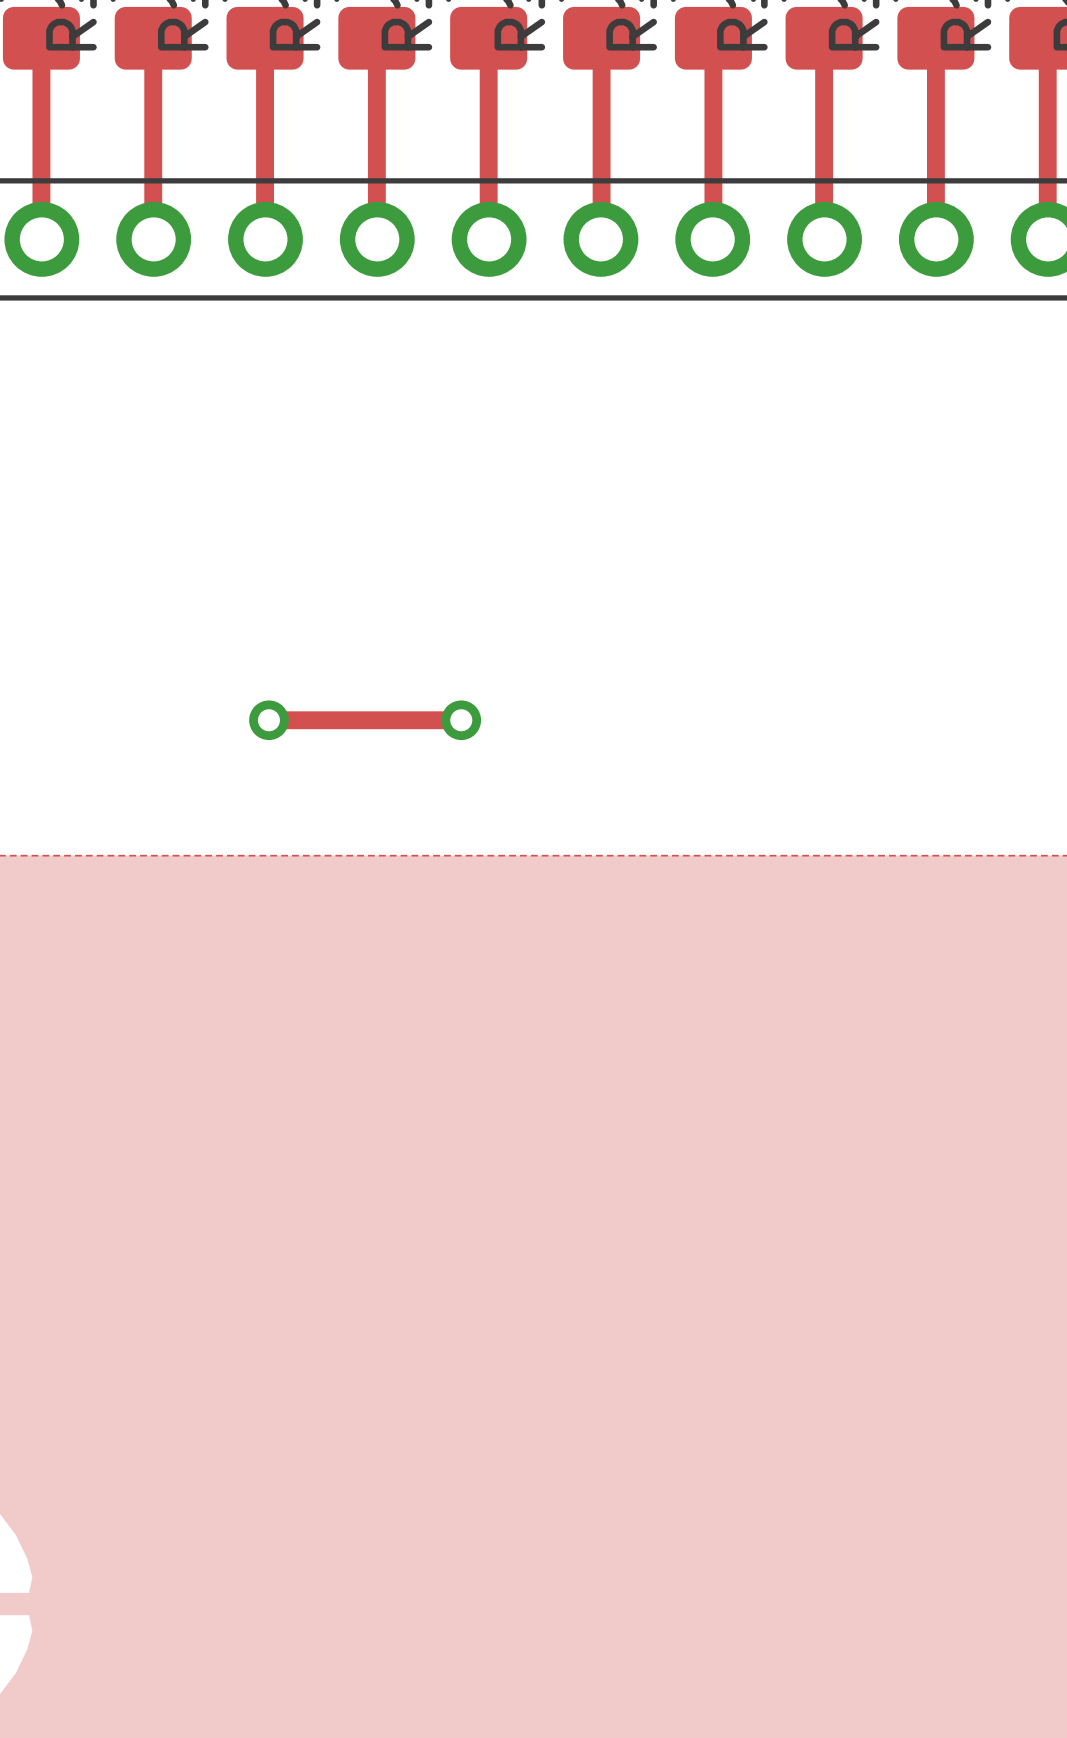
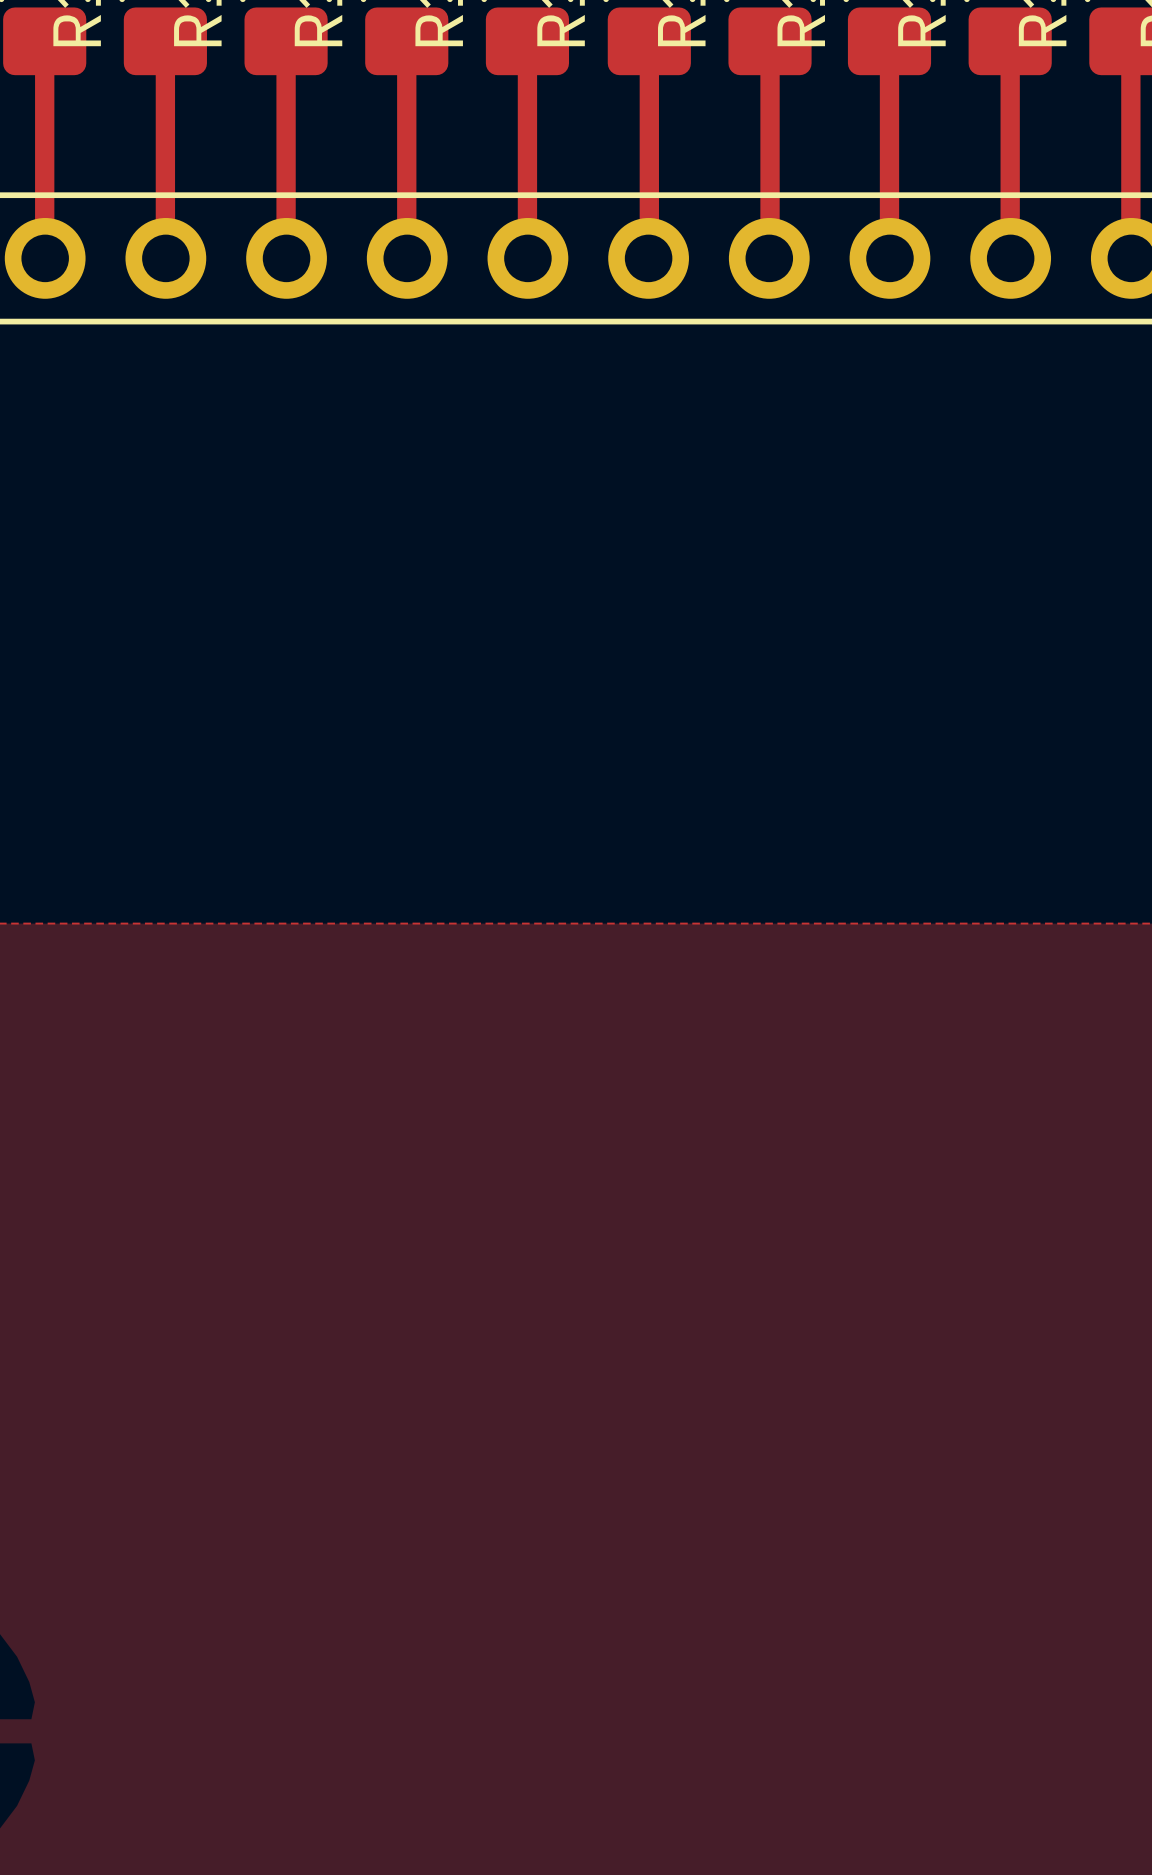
track: (268, 720) (461, 720) -> none
via: (268, 720) -> none
via: (461, 720) -> none

